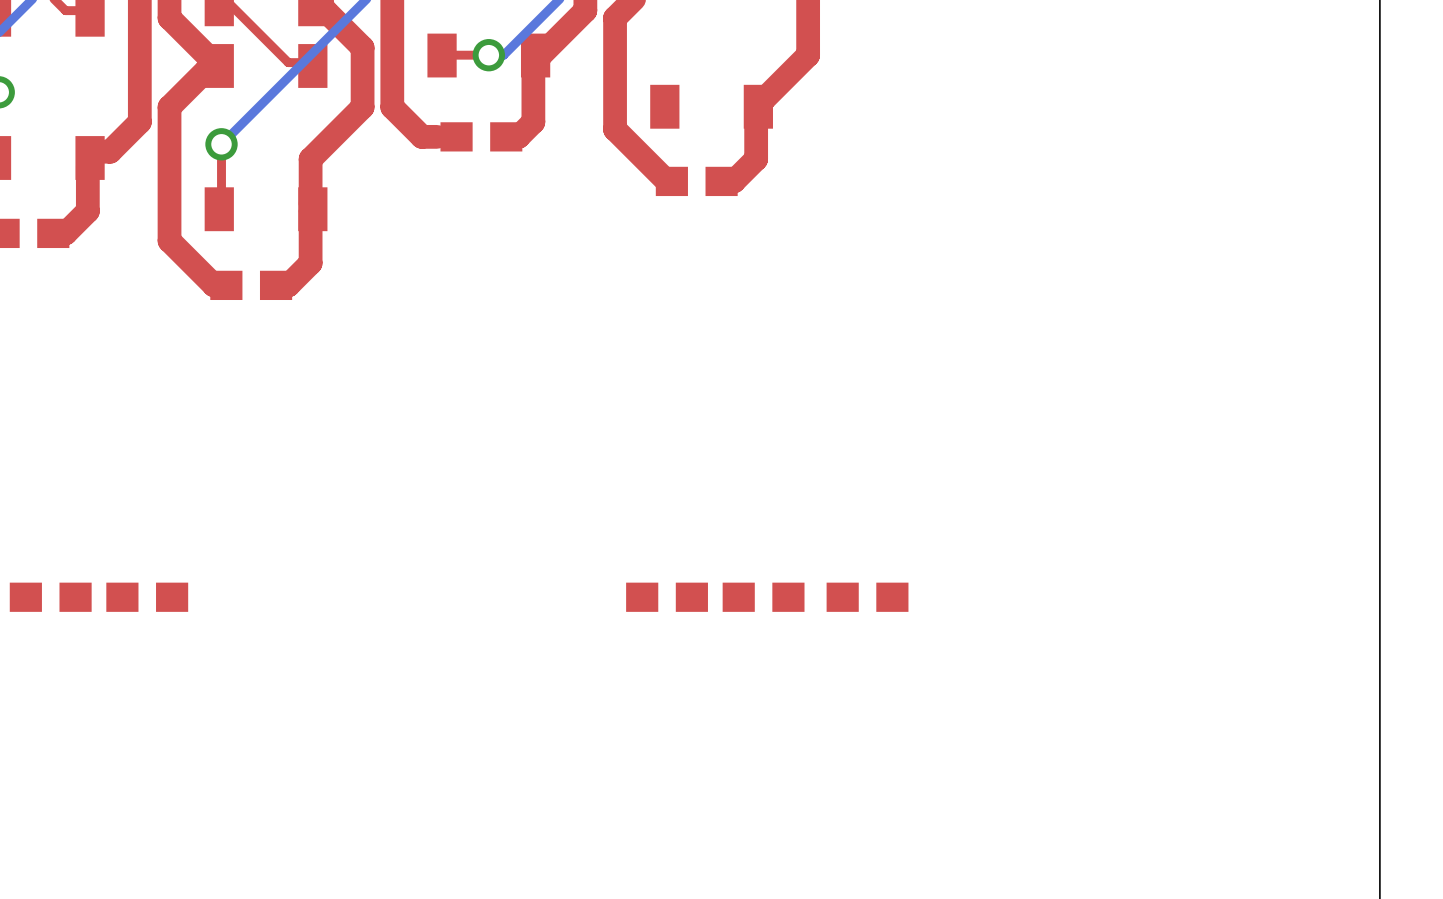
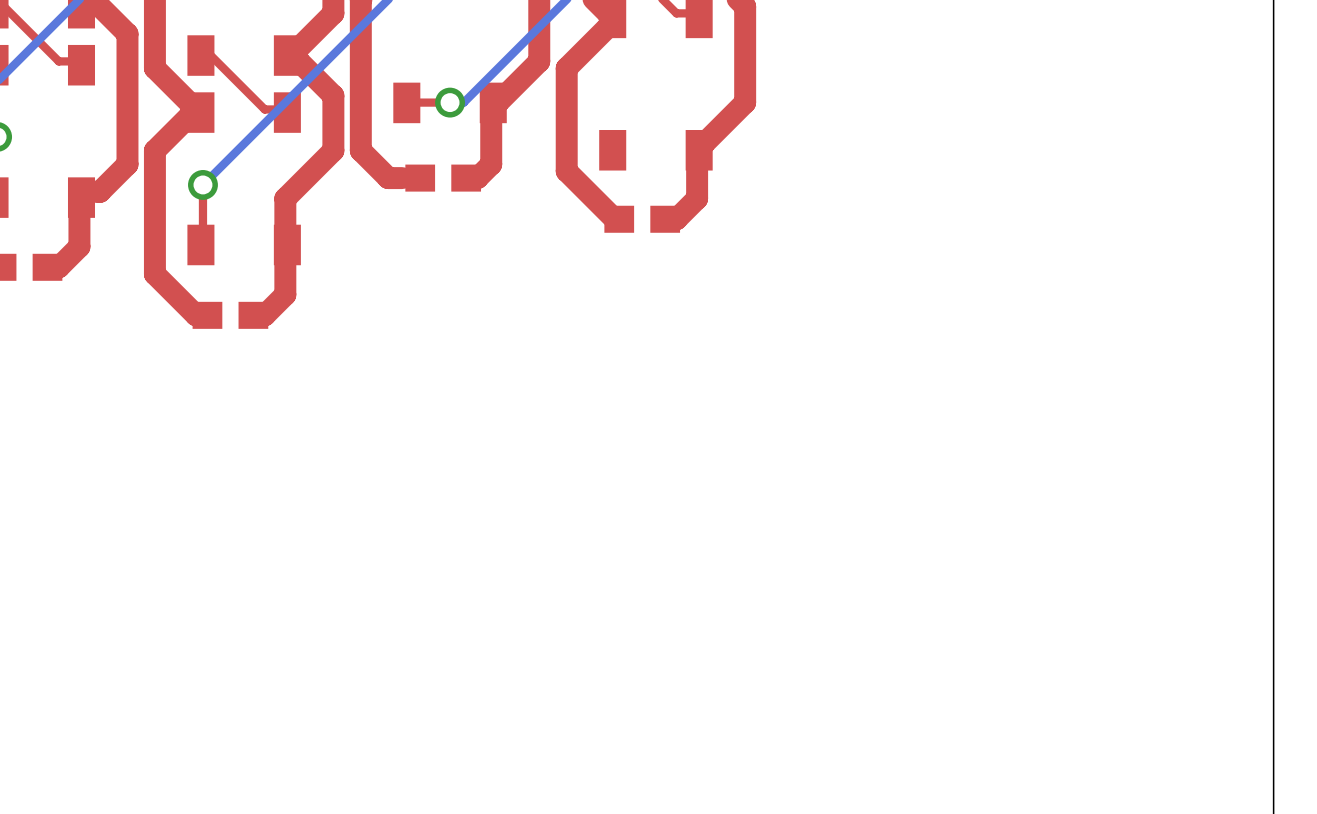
part: (50, 597) -> none
part: (147, 597) -> none
part: (667, 597) -> none
part: (763, 597) -> none
part: (867, 597) -> none

